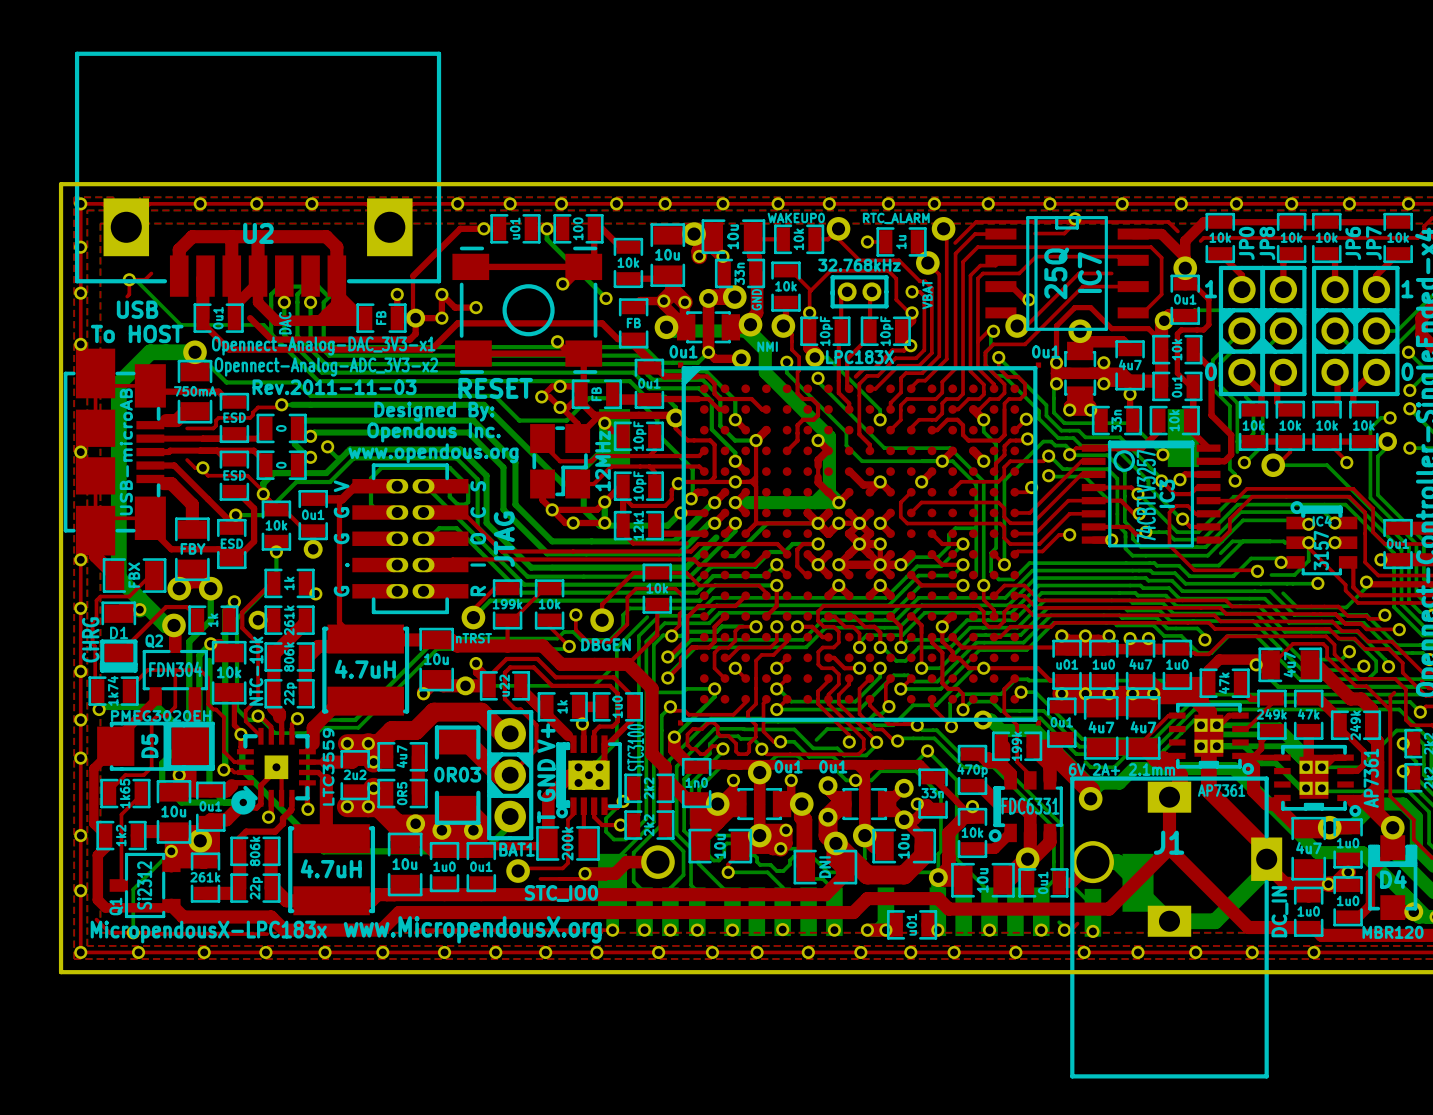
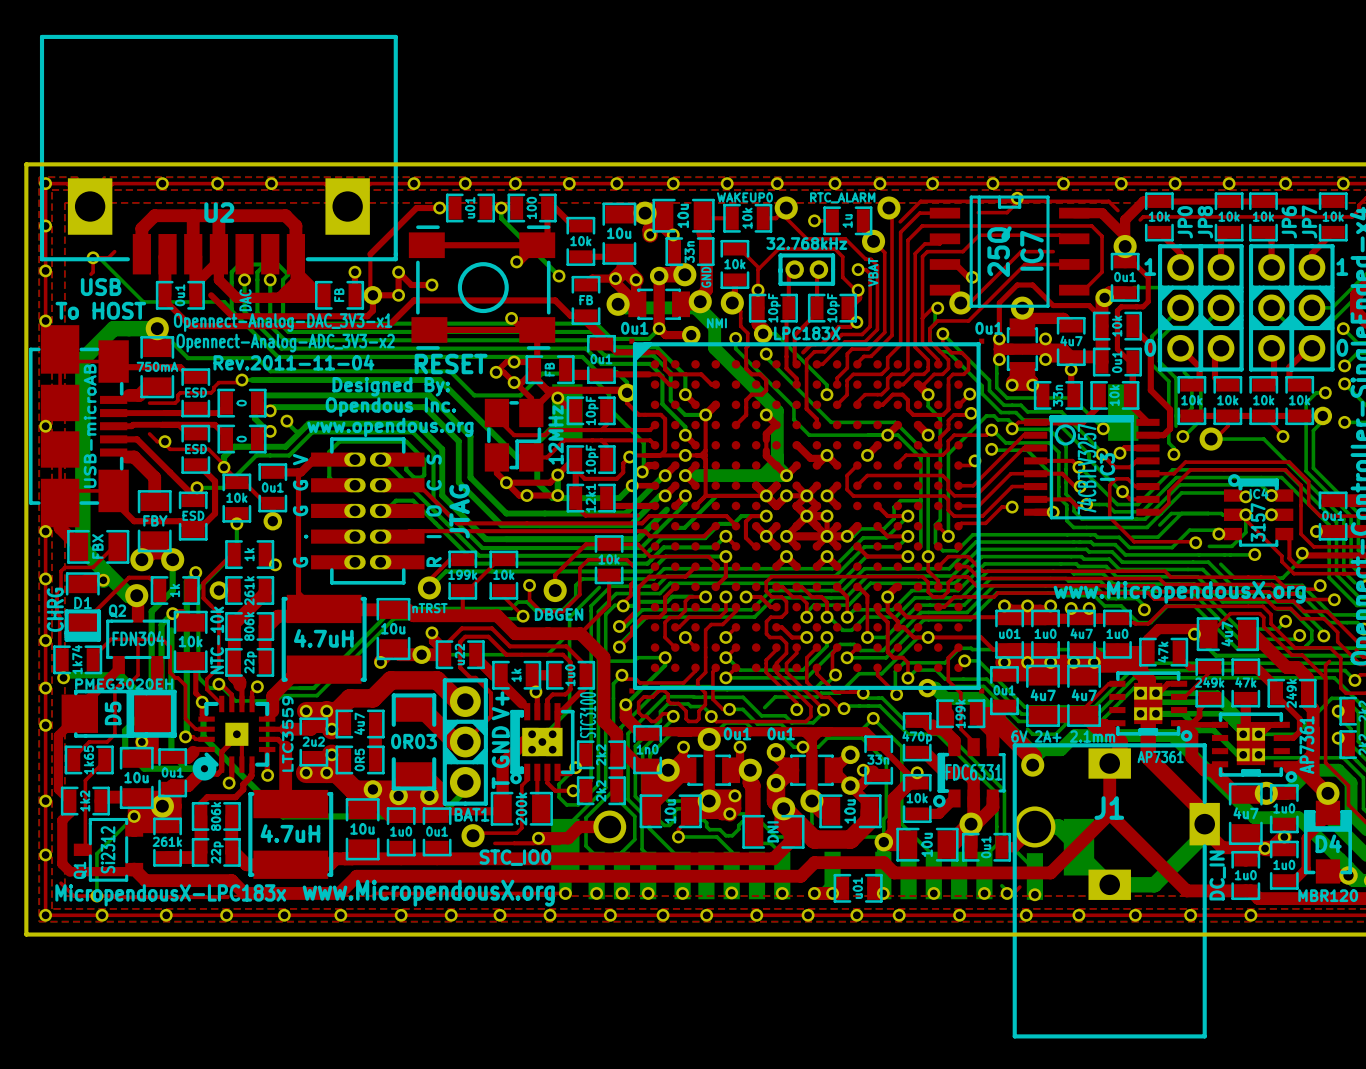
text: Rev.2011-11-03 (334, 387) -> Rev.2011-11-04 (293, 362)
text: none -> www.MicropendousX.org (1179, 592)

